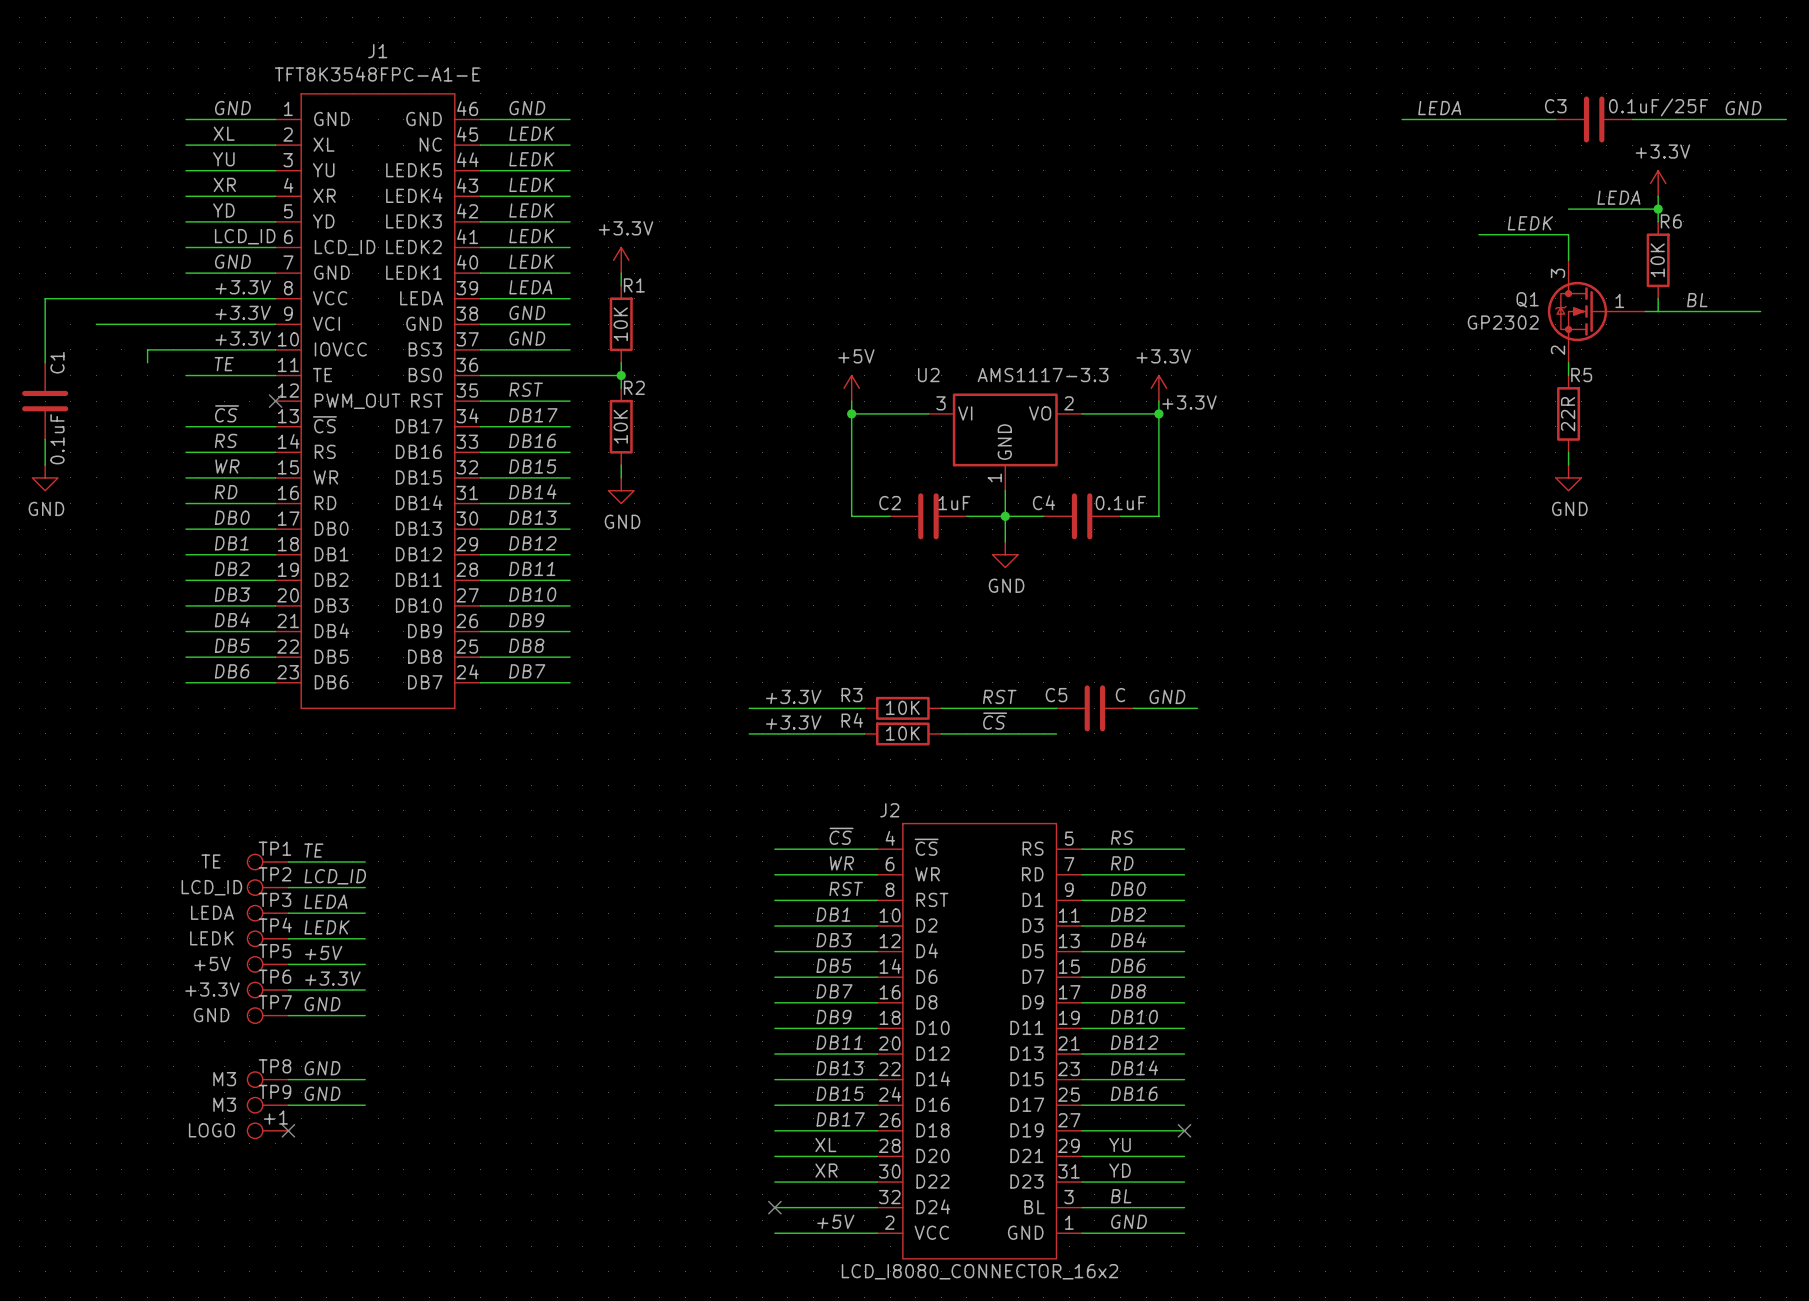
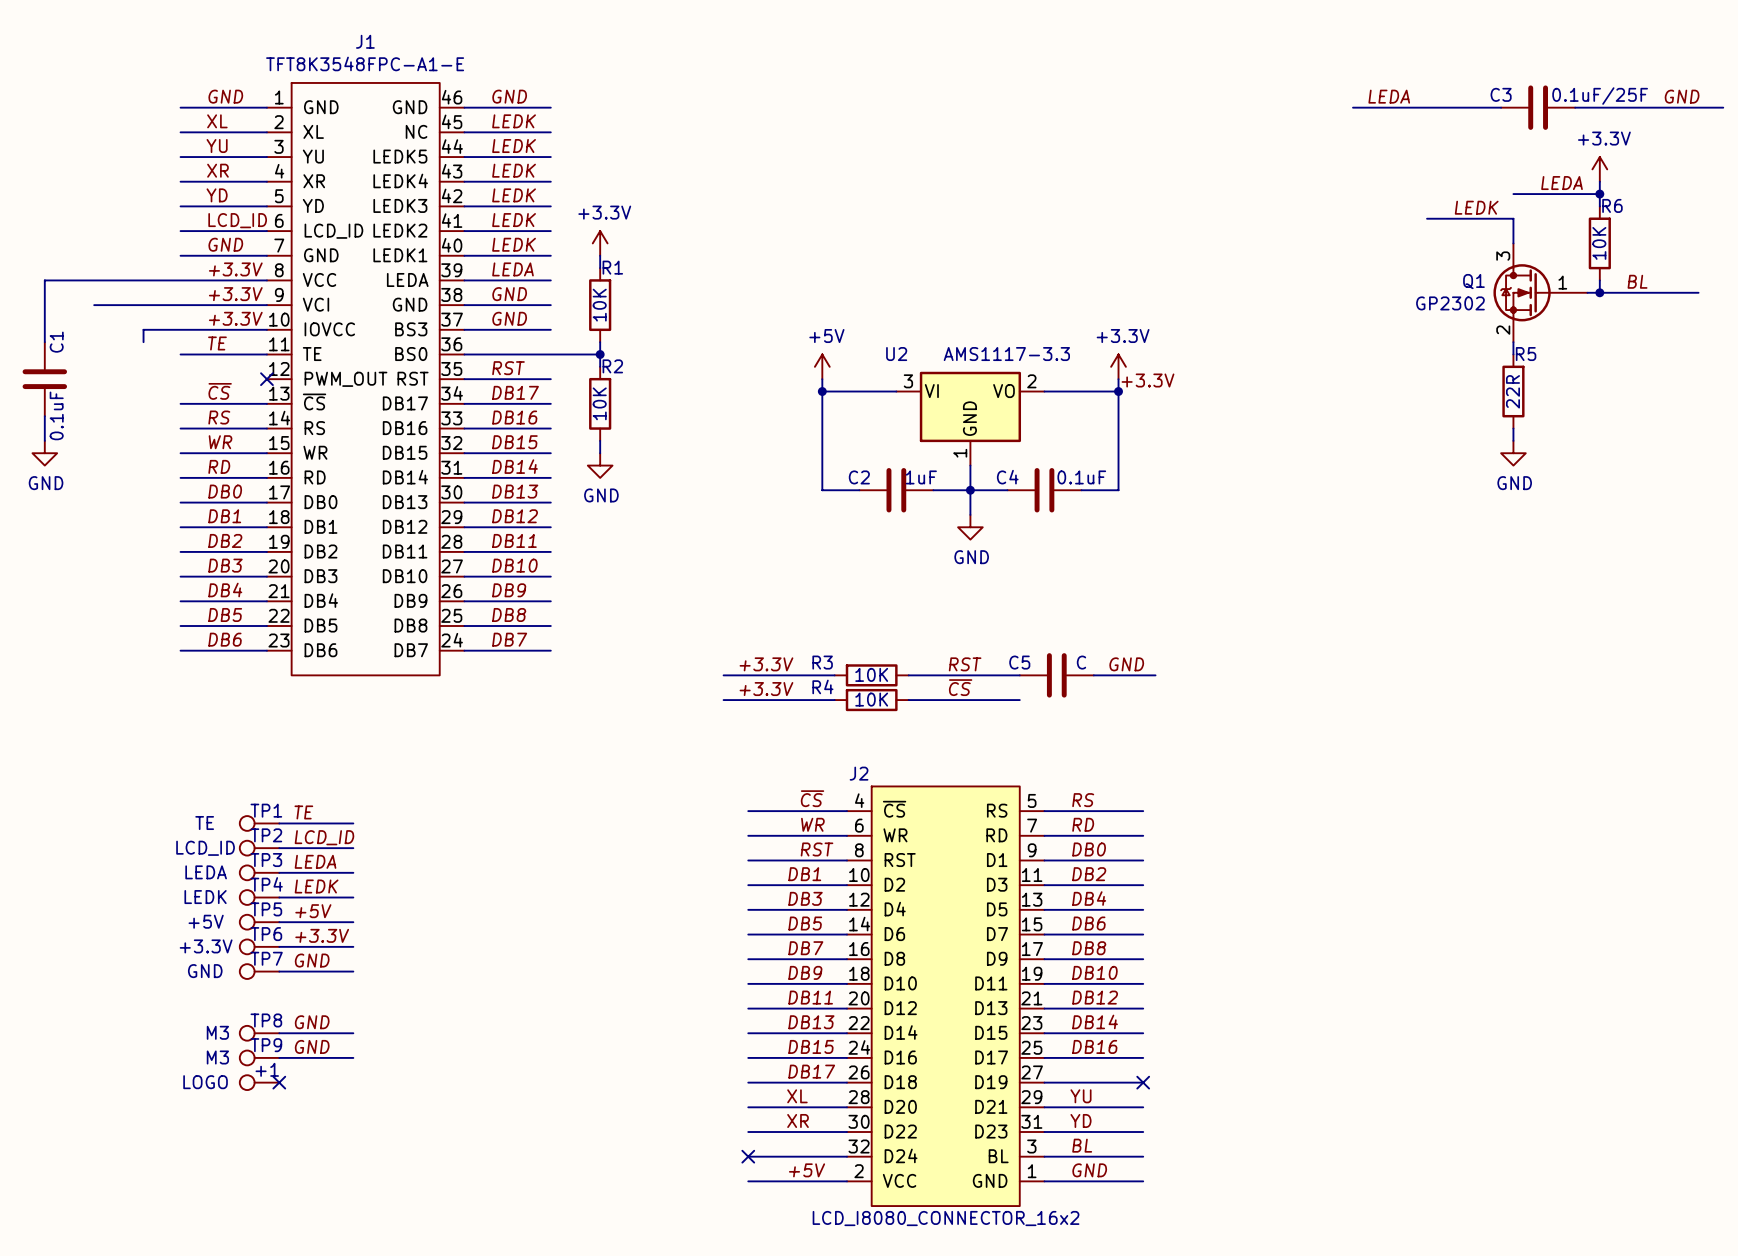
junction: none -> (1599, 292)

